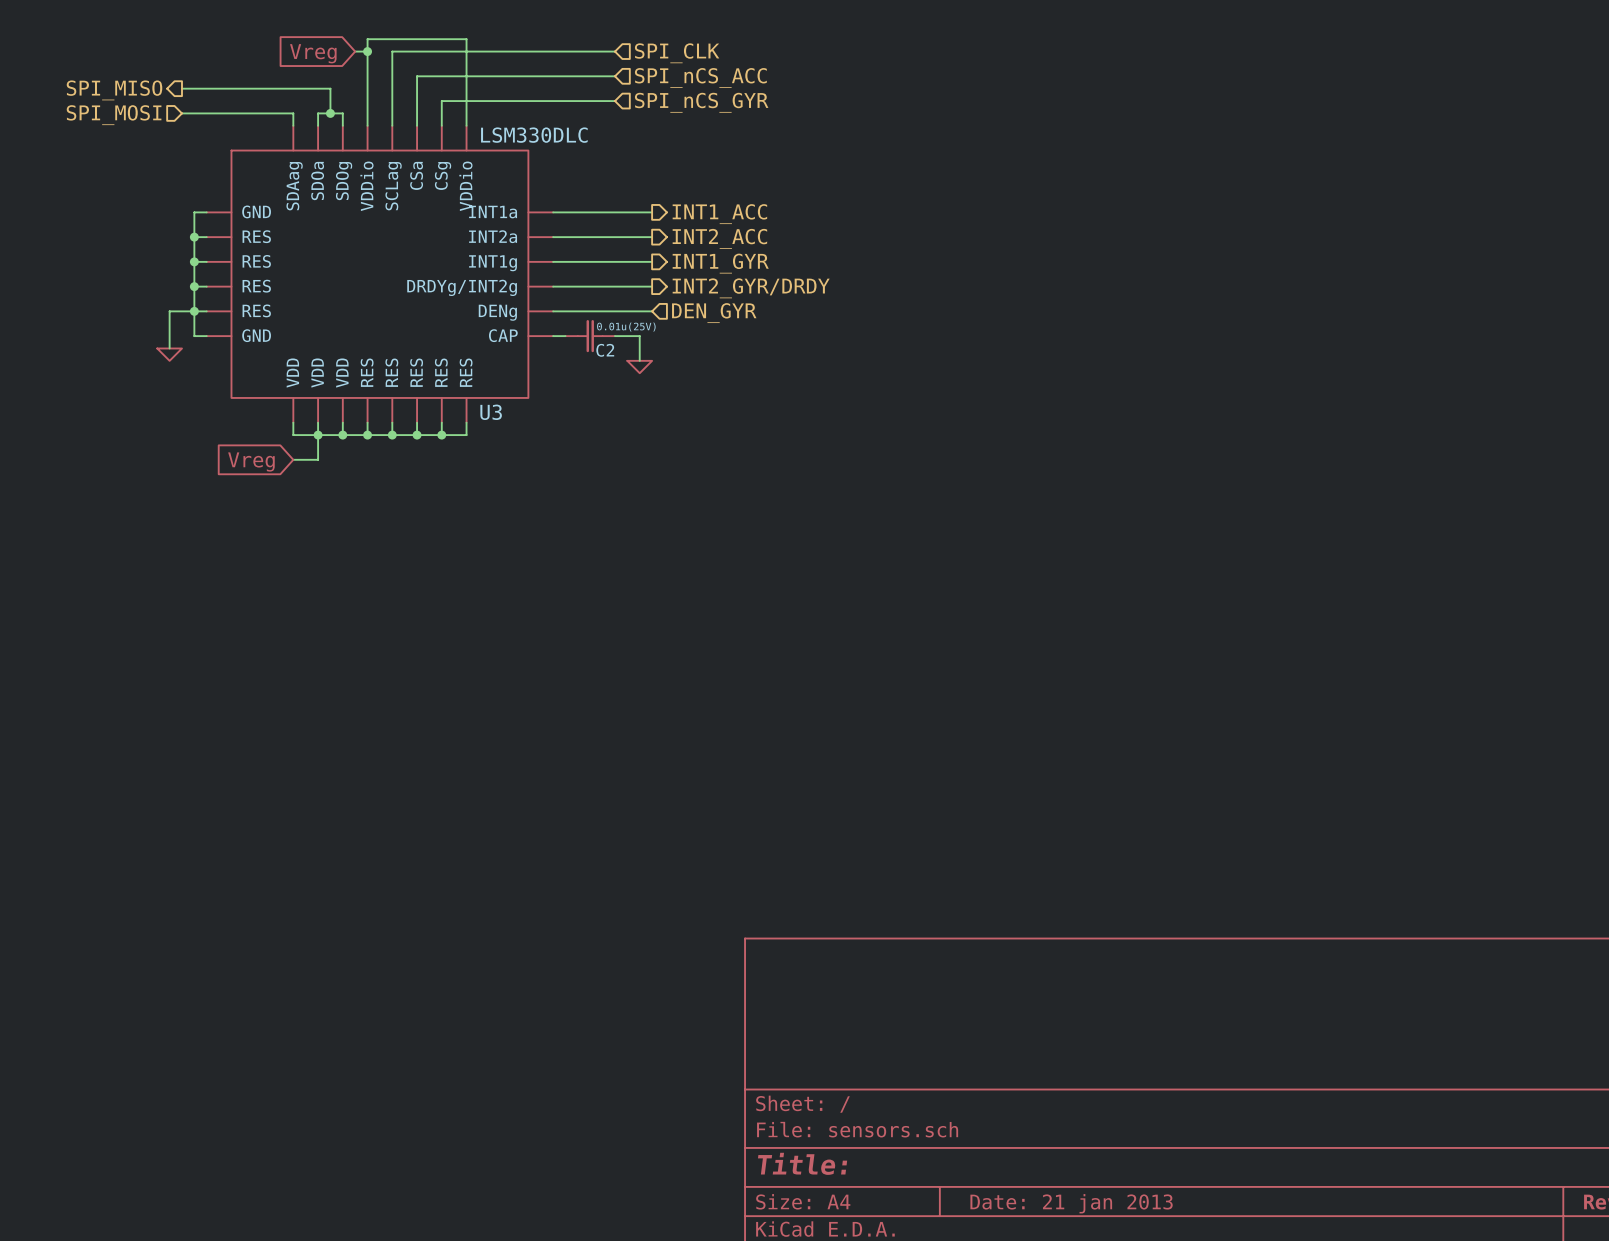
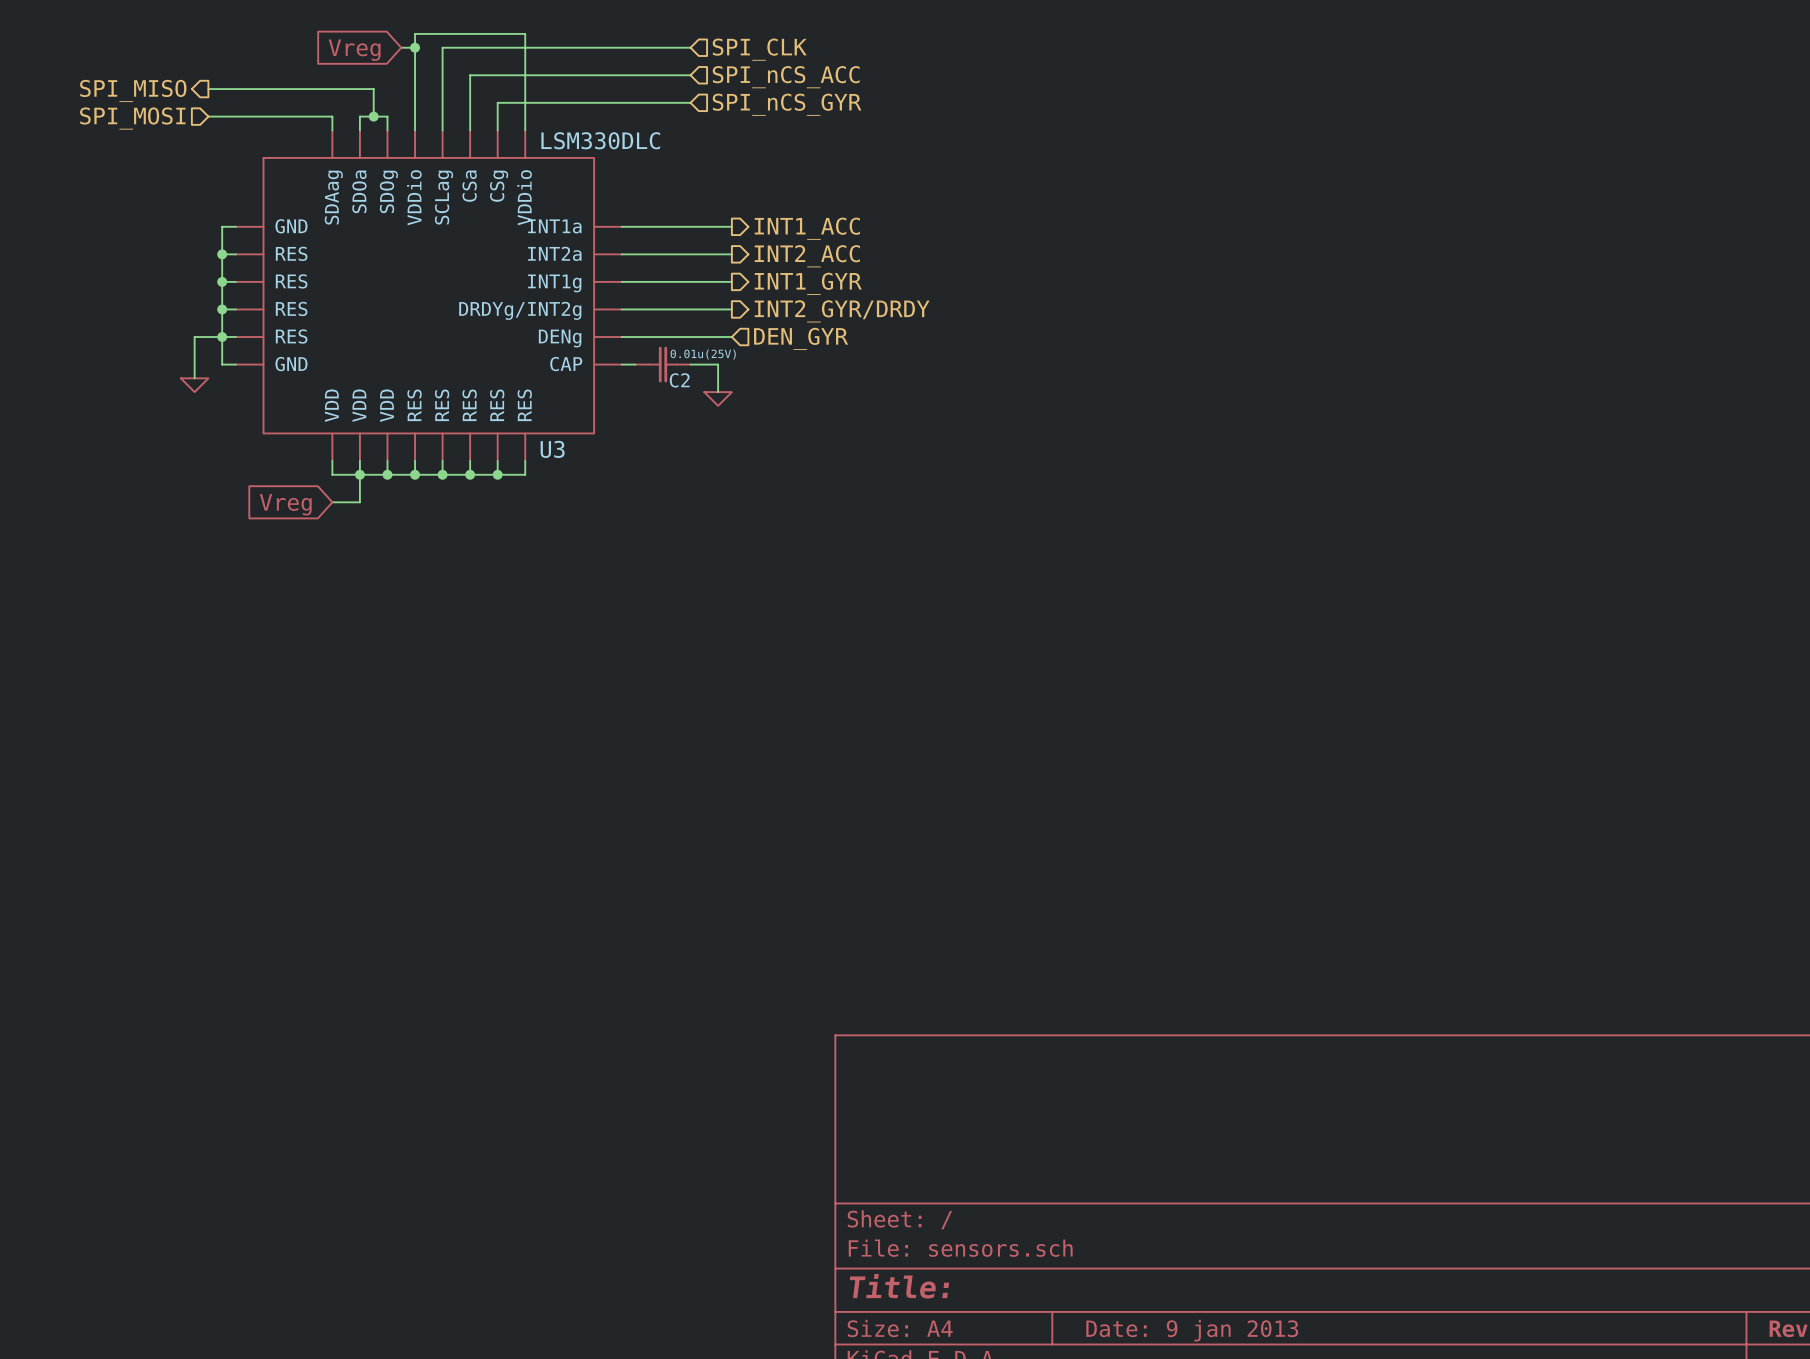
title block: Date: 21 jan 2013 (1071, 1203) -> Date: 9 jan 2013 (1192, 1330)

